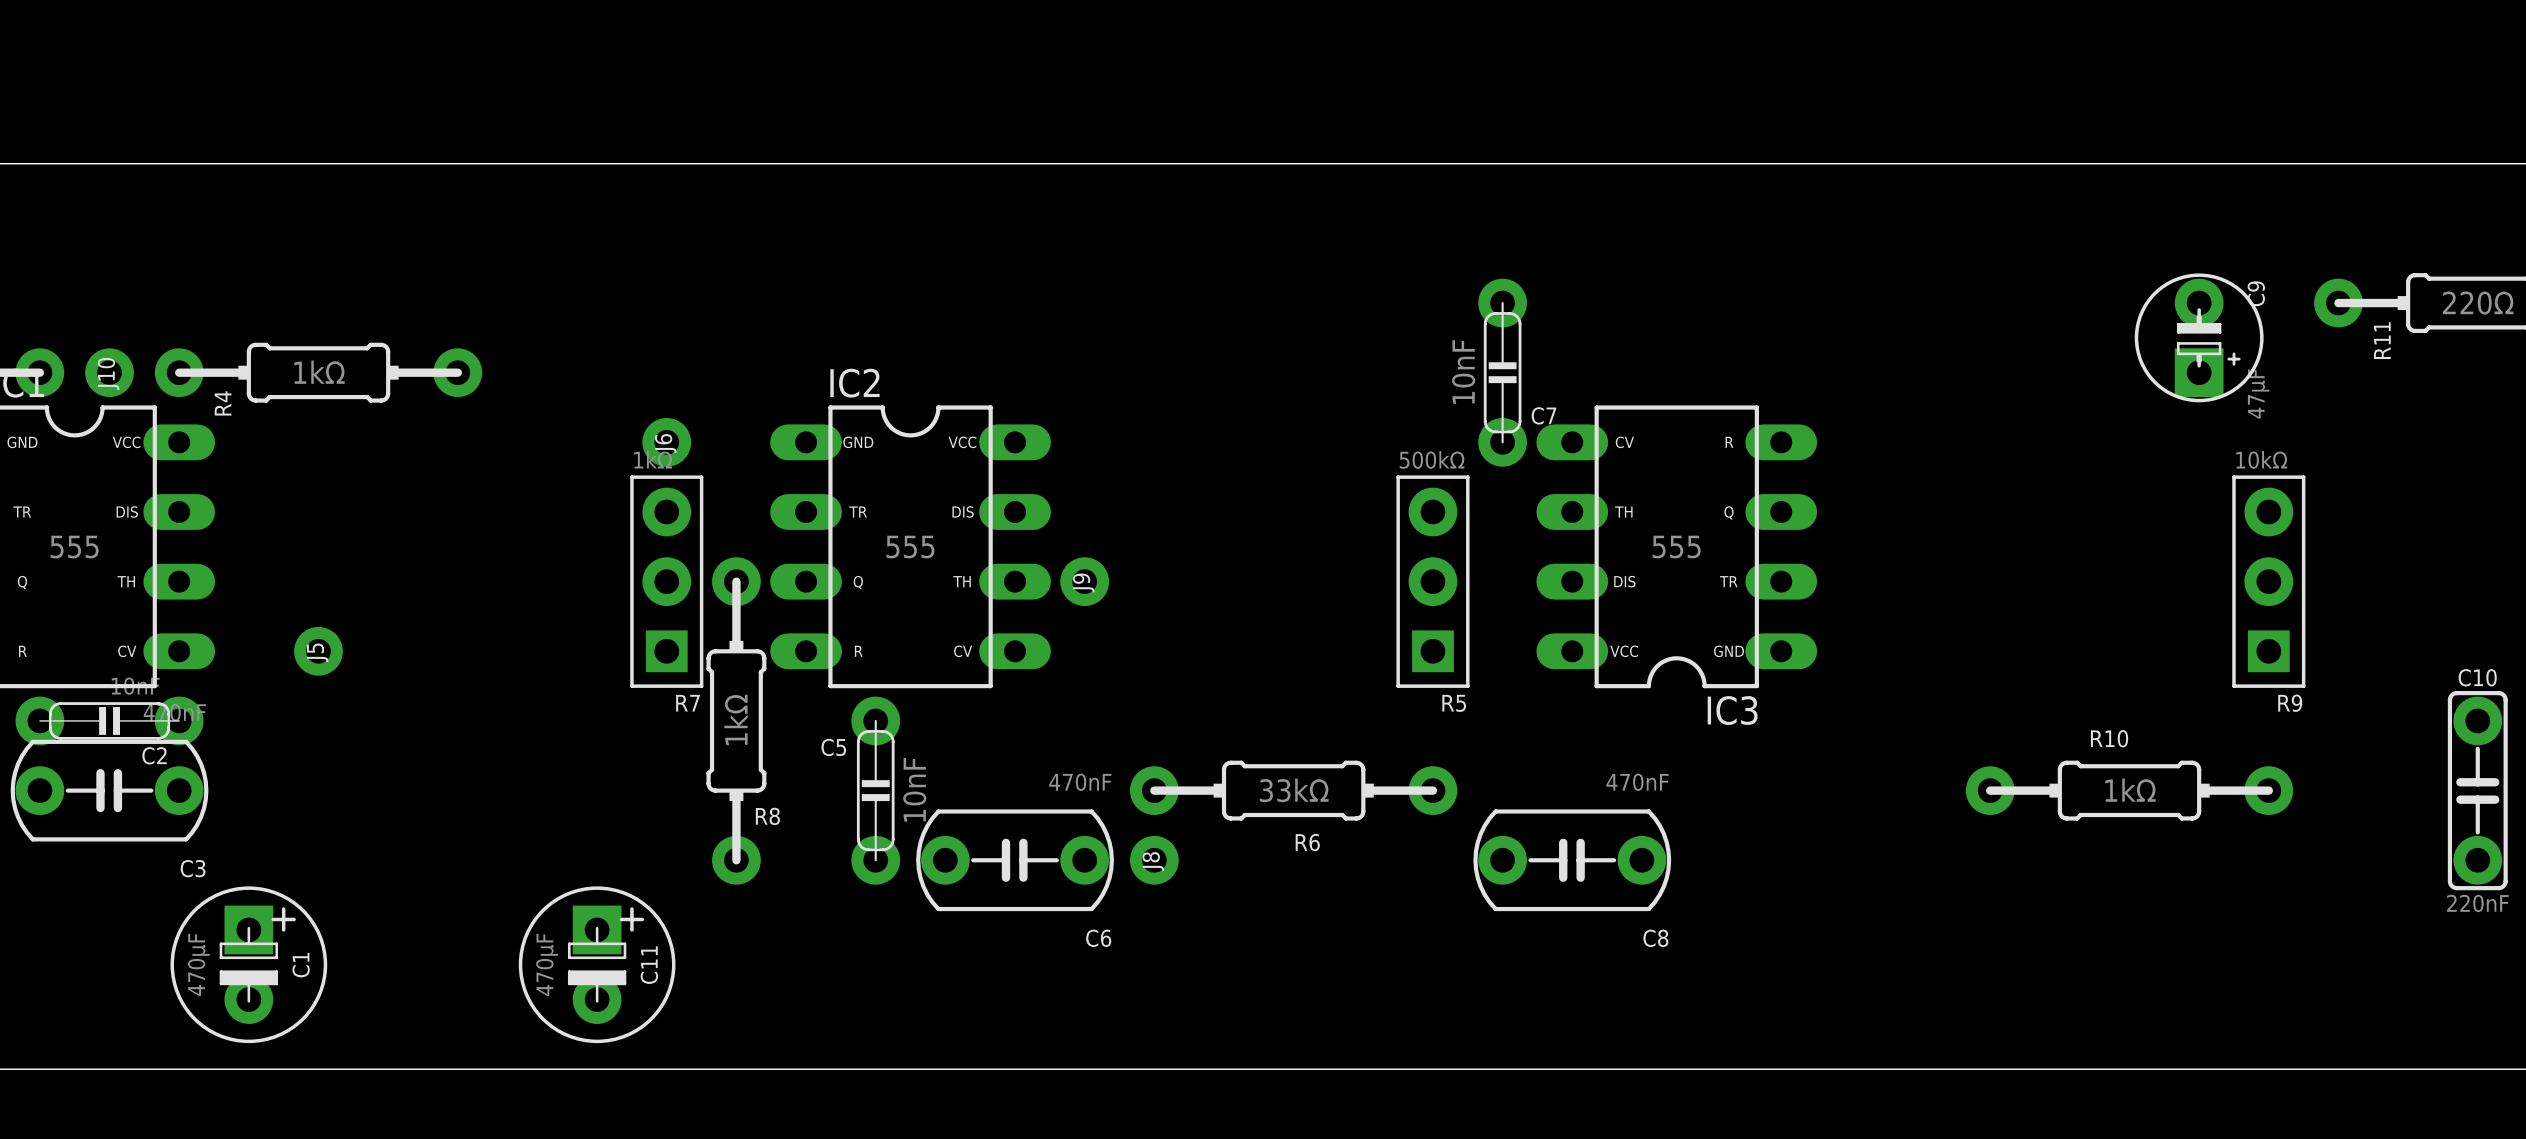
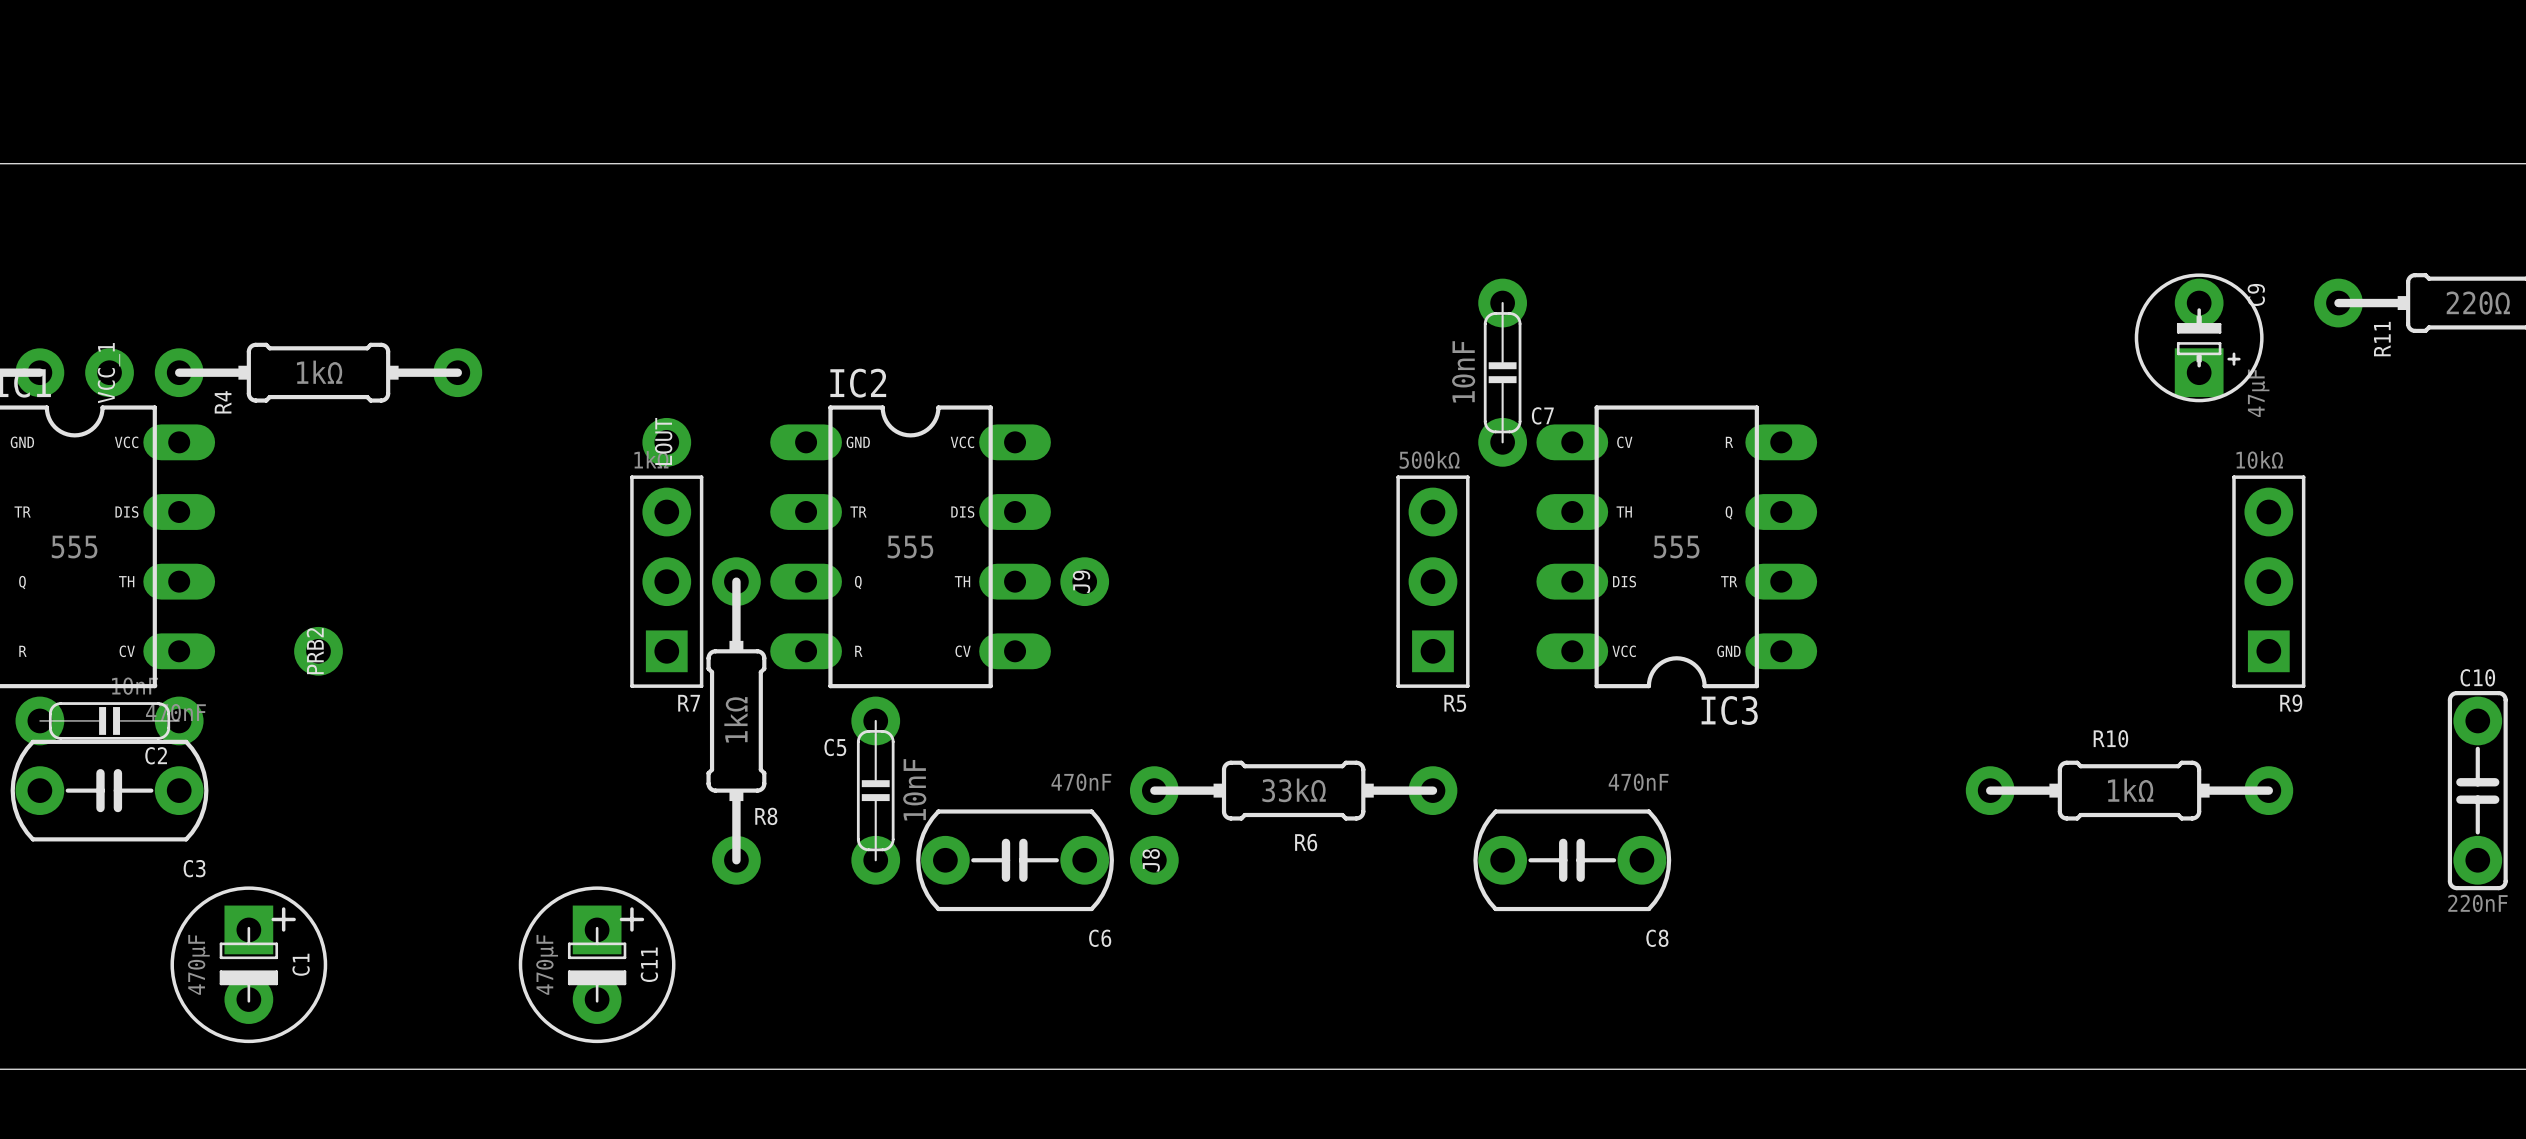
J10 name: J10 (108, 373) -> VCC_1 (108, 373)
J6 name: J6 (665, 443) -> LOUT (663, 441)
J5 name: J5 (317, 652) -> PRB2 (315, 651)

